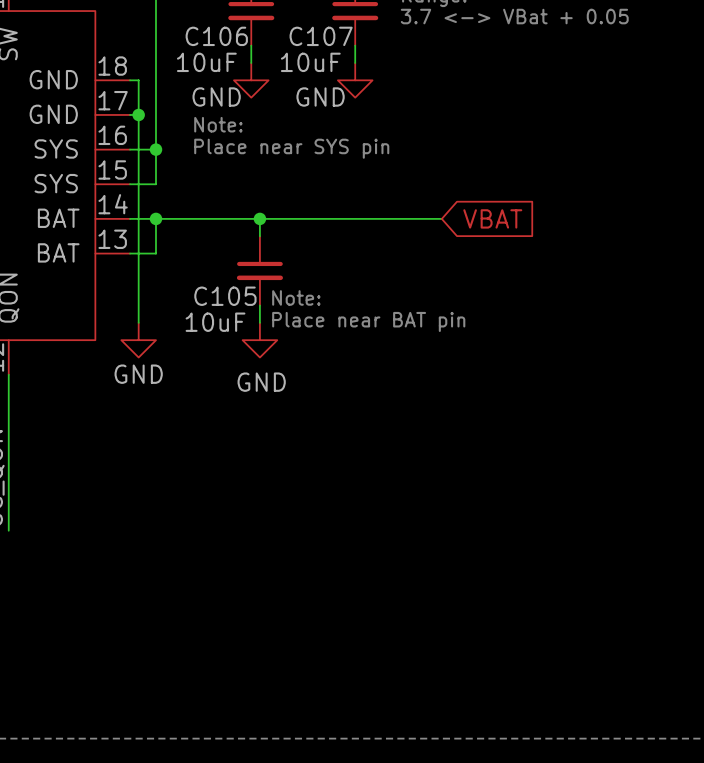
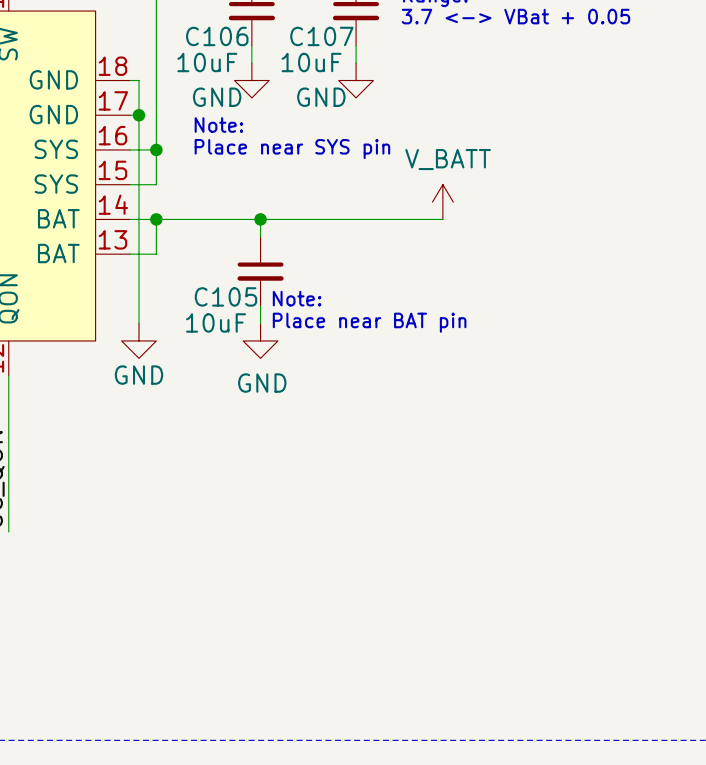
power symbol: none -> V_BATT (442, 202)
global label: VBAT (492, 218) -> none

